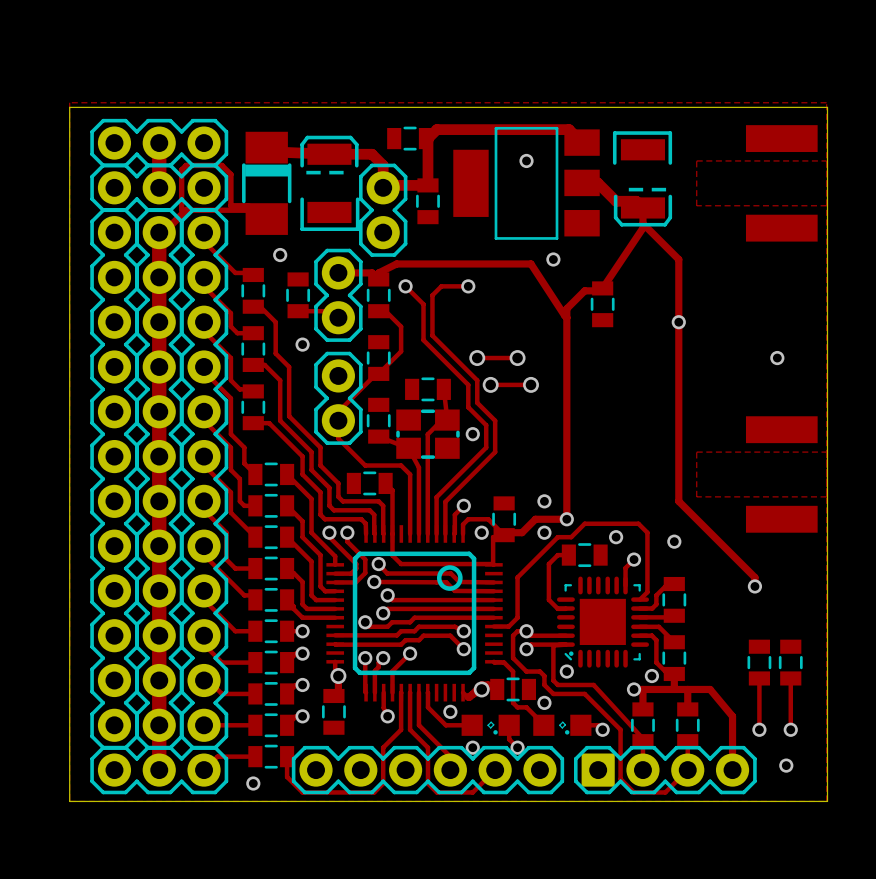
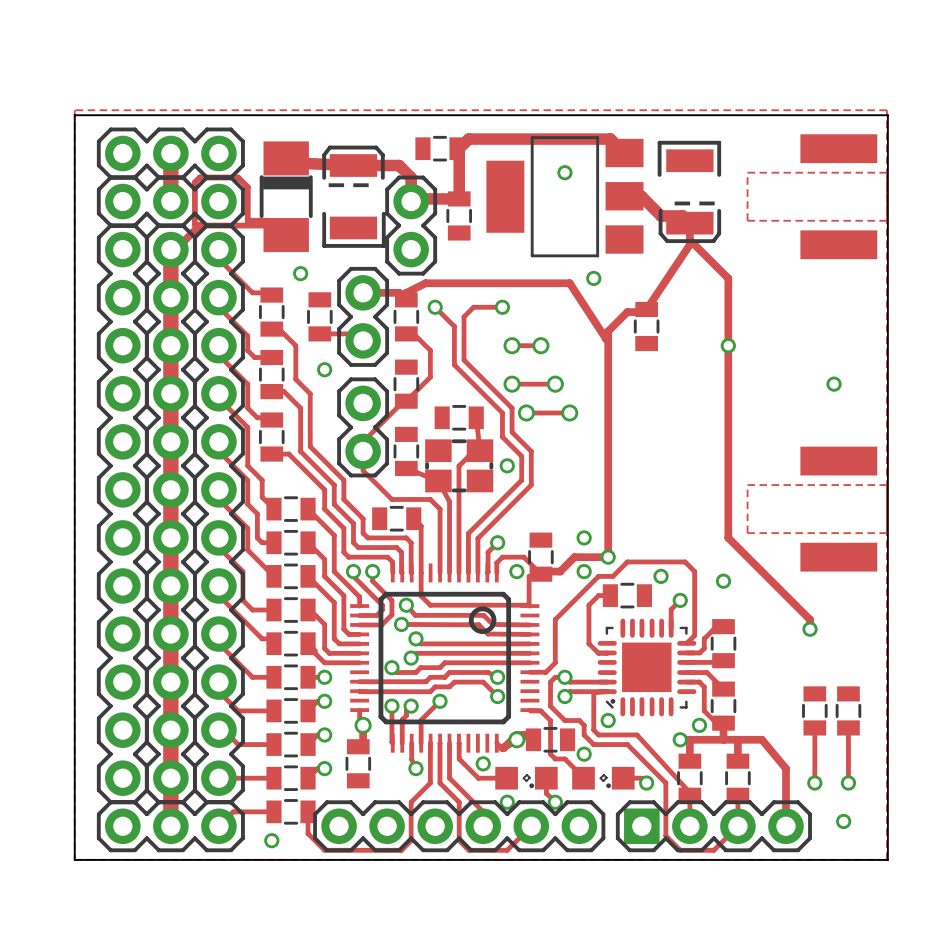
track: none -> (512, 345) (540, 345)
via: none -> (512, 345)
via: none -> (540, 345)

